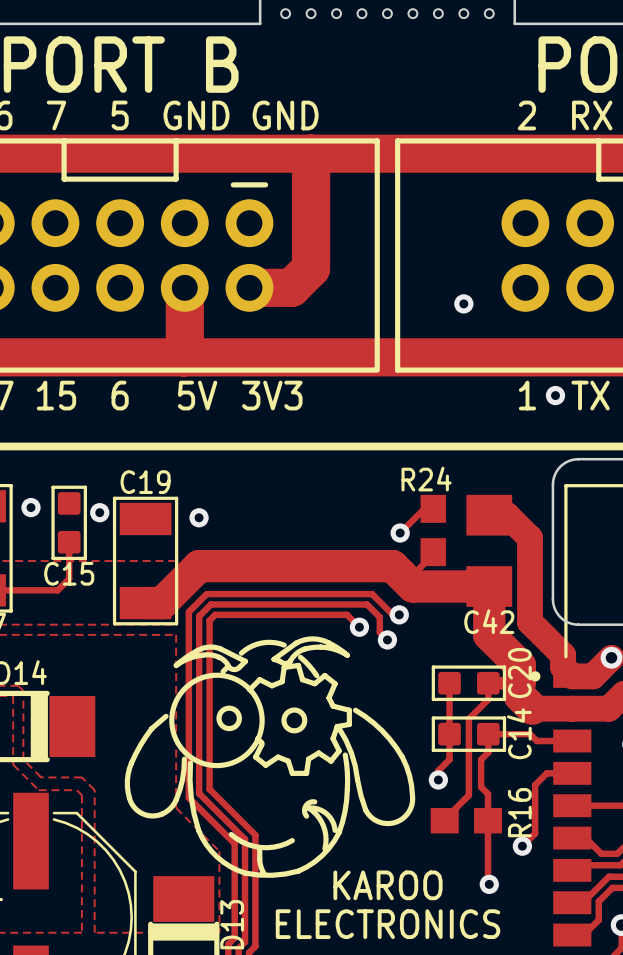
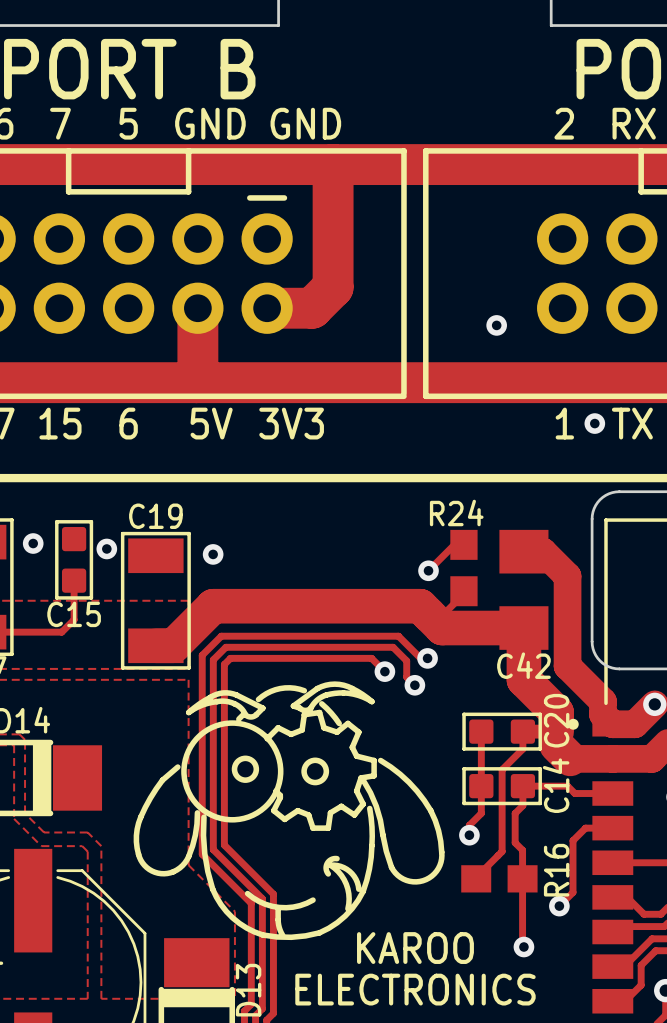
hole: (285, 13) -> none
hole: (311, 13) -> none
hole: (336, 13) -> none
hole: (361, 13) -> none
hole: (387, 13) -> none
hole: (412, 13) -> none
hole: (438, 13) -> none
hole: (463, 13) -> none
hole: (489, 13) -> none

